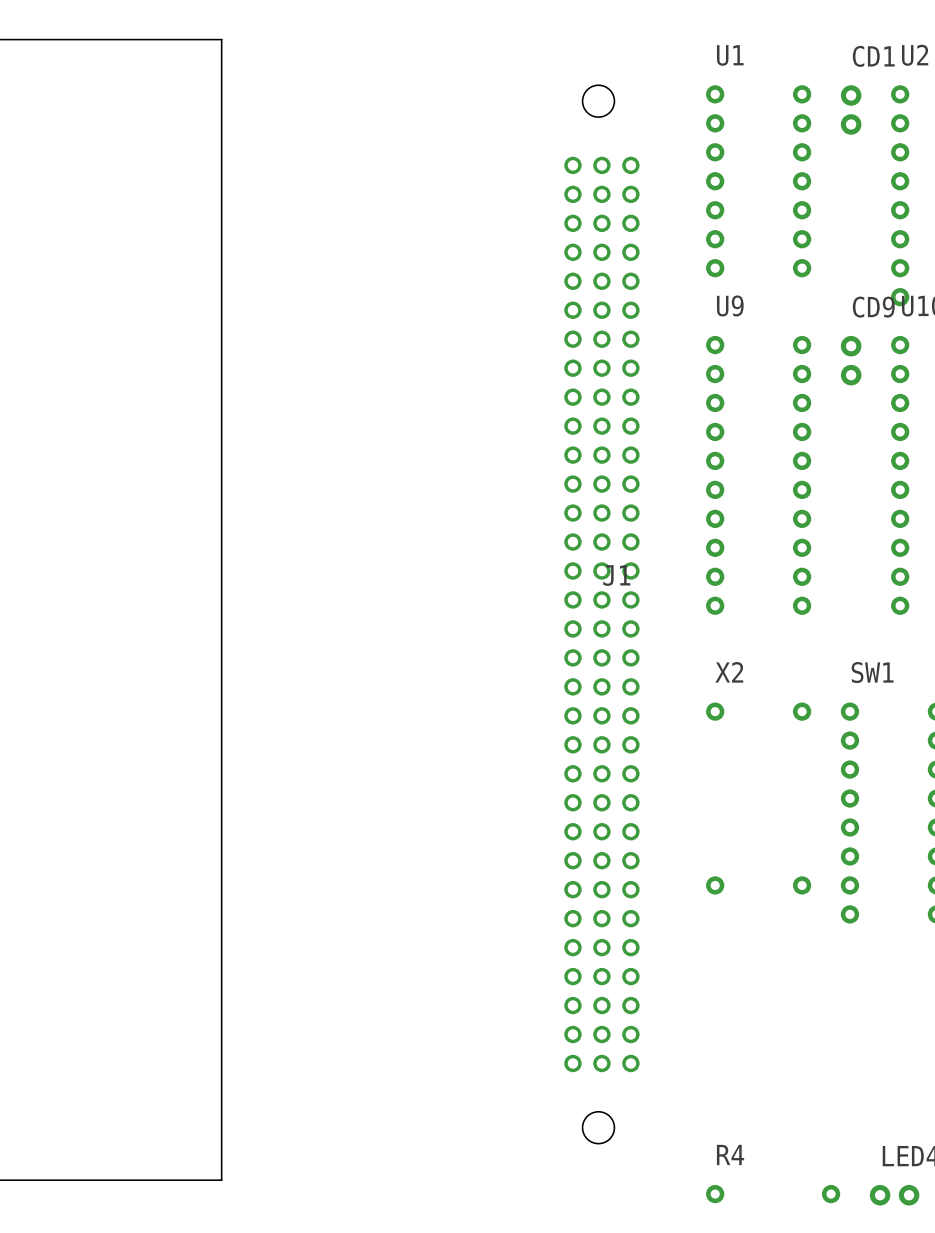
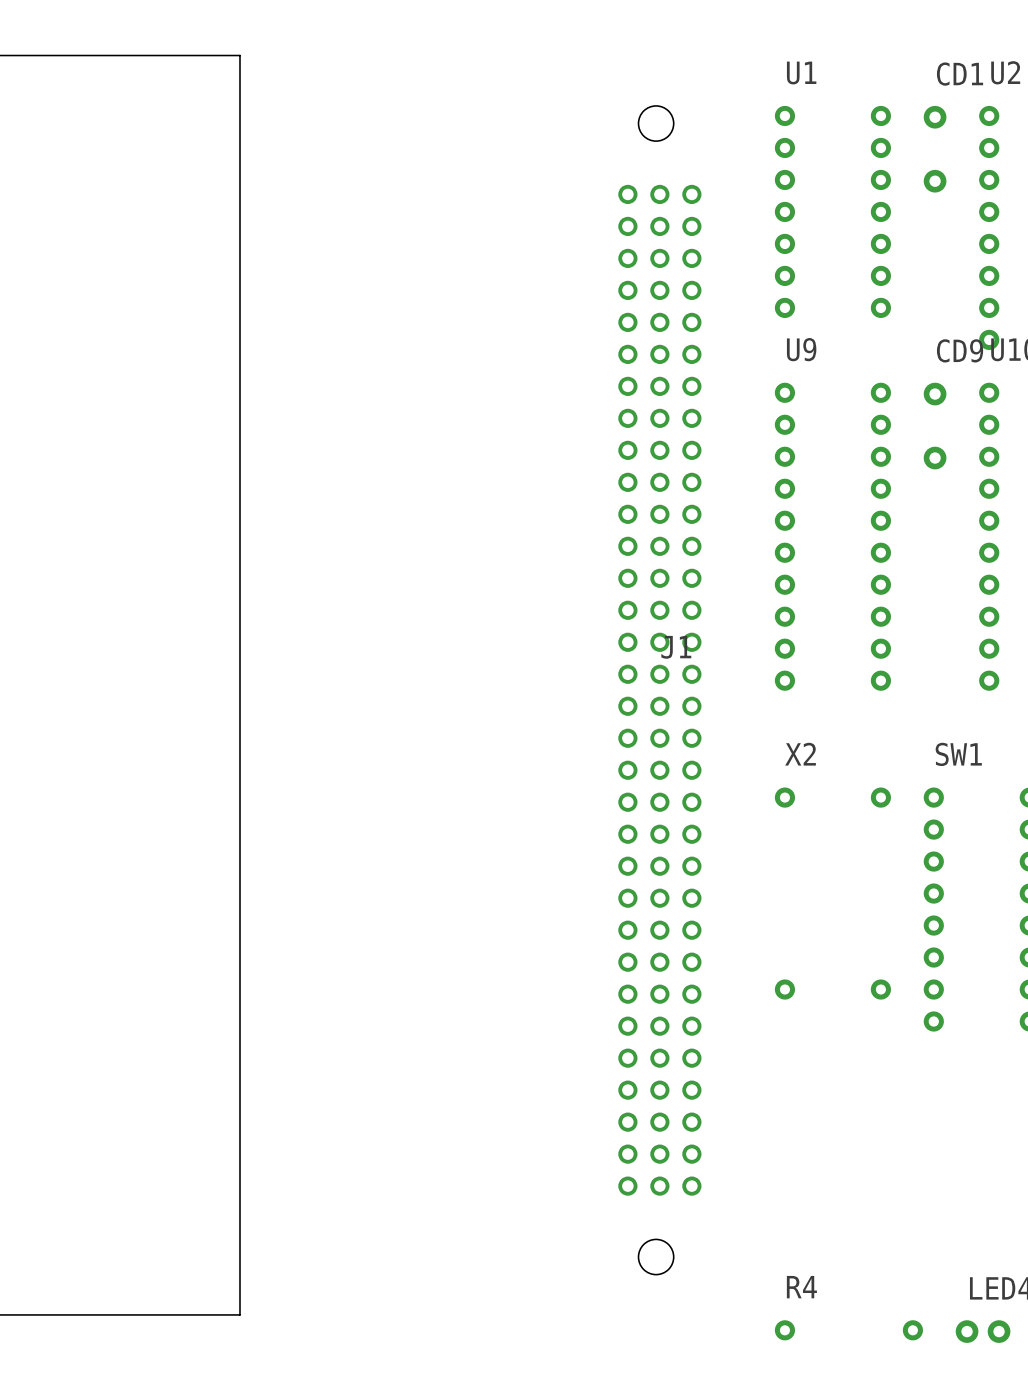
CD1 footprint: [840, 85, 862, 135] -> [923, 105, 947, 193]
CD9 footprint: [840, 335, 862, 386] -> [923, 382, 947, 470]

